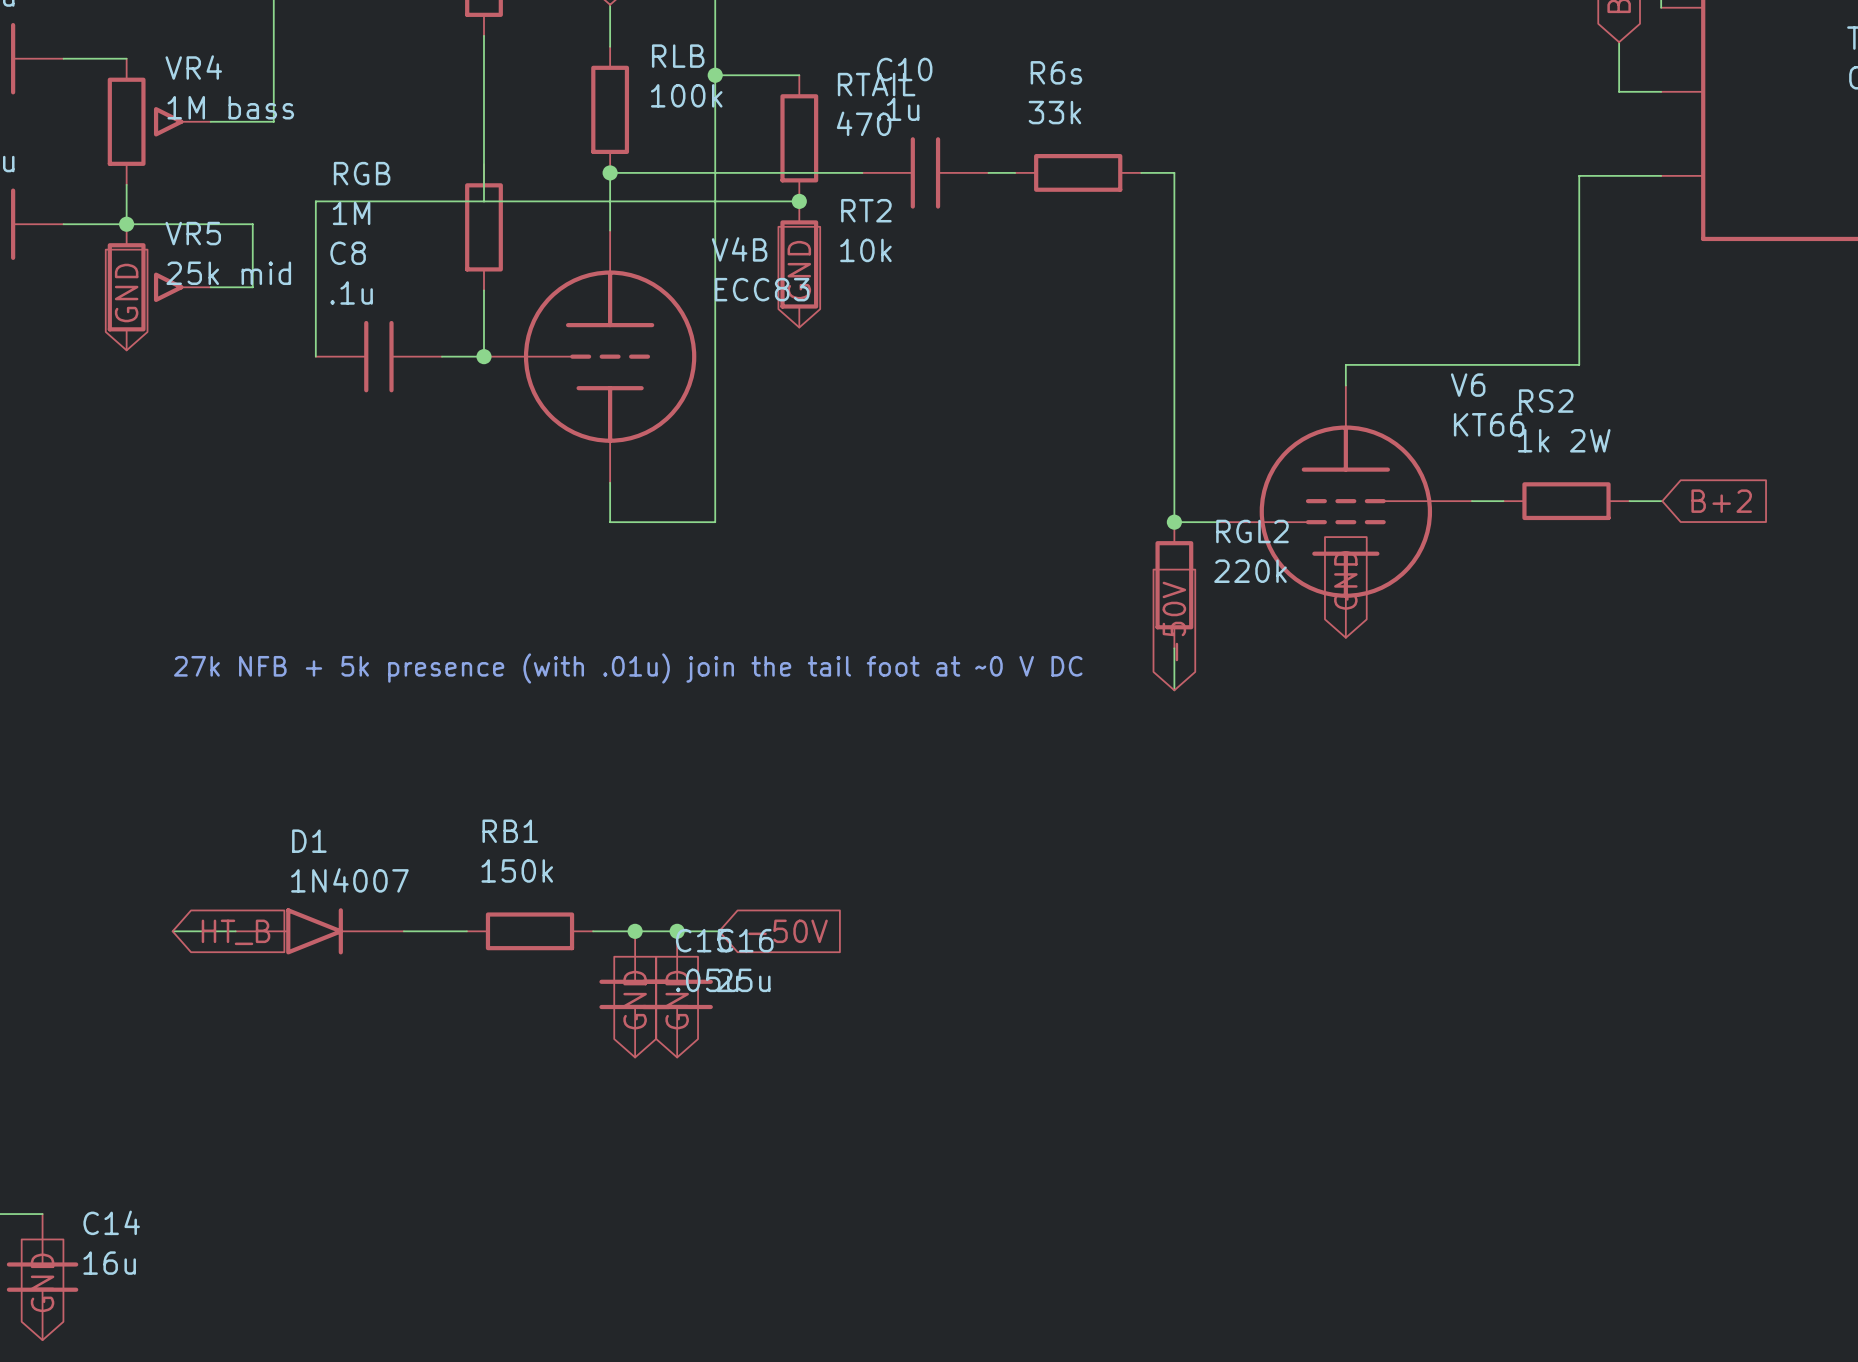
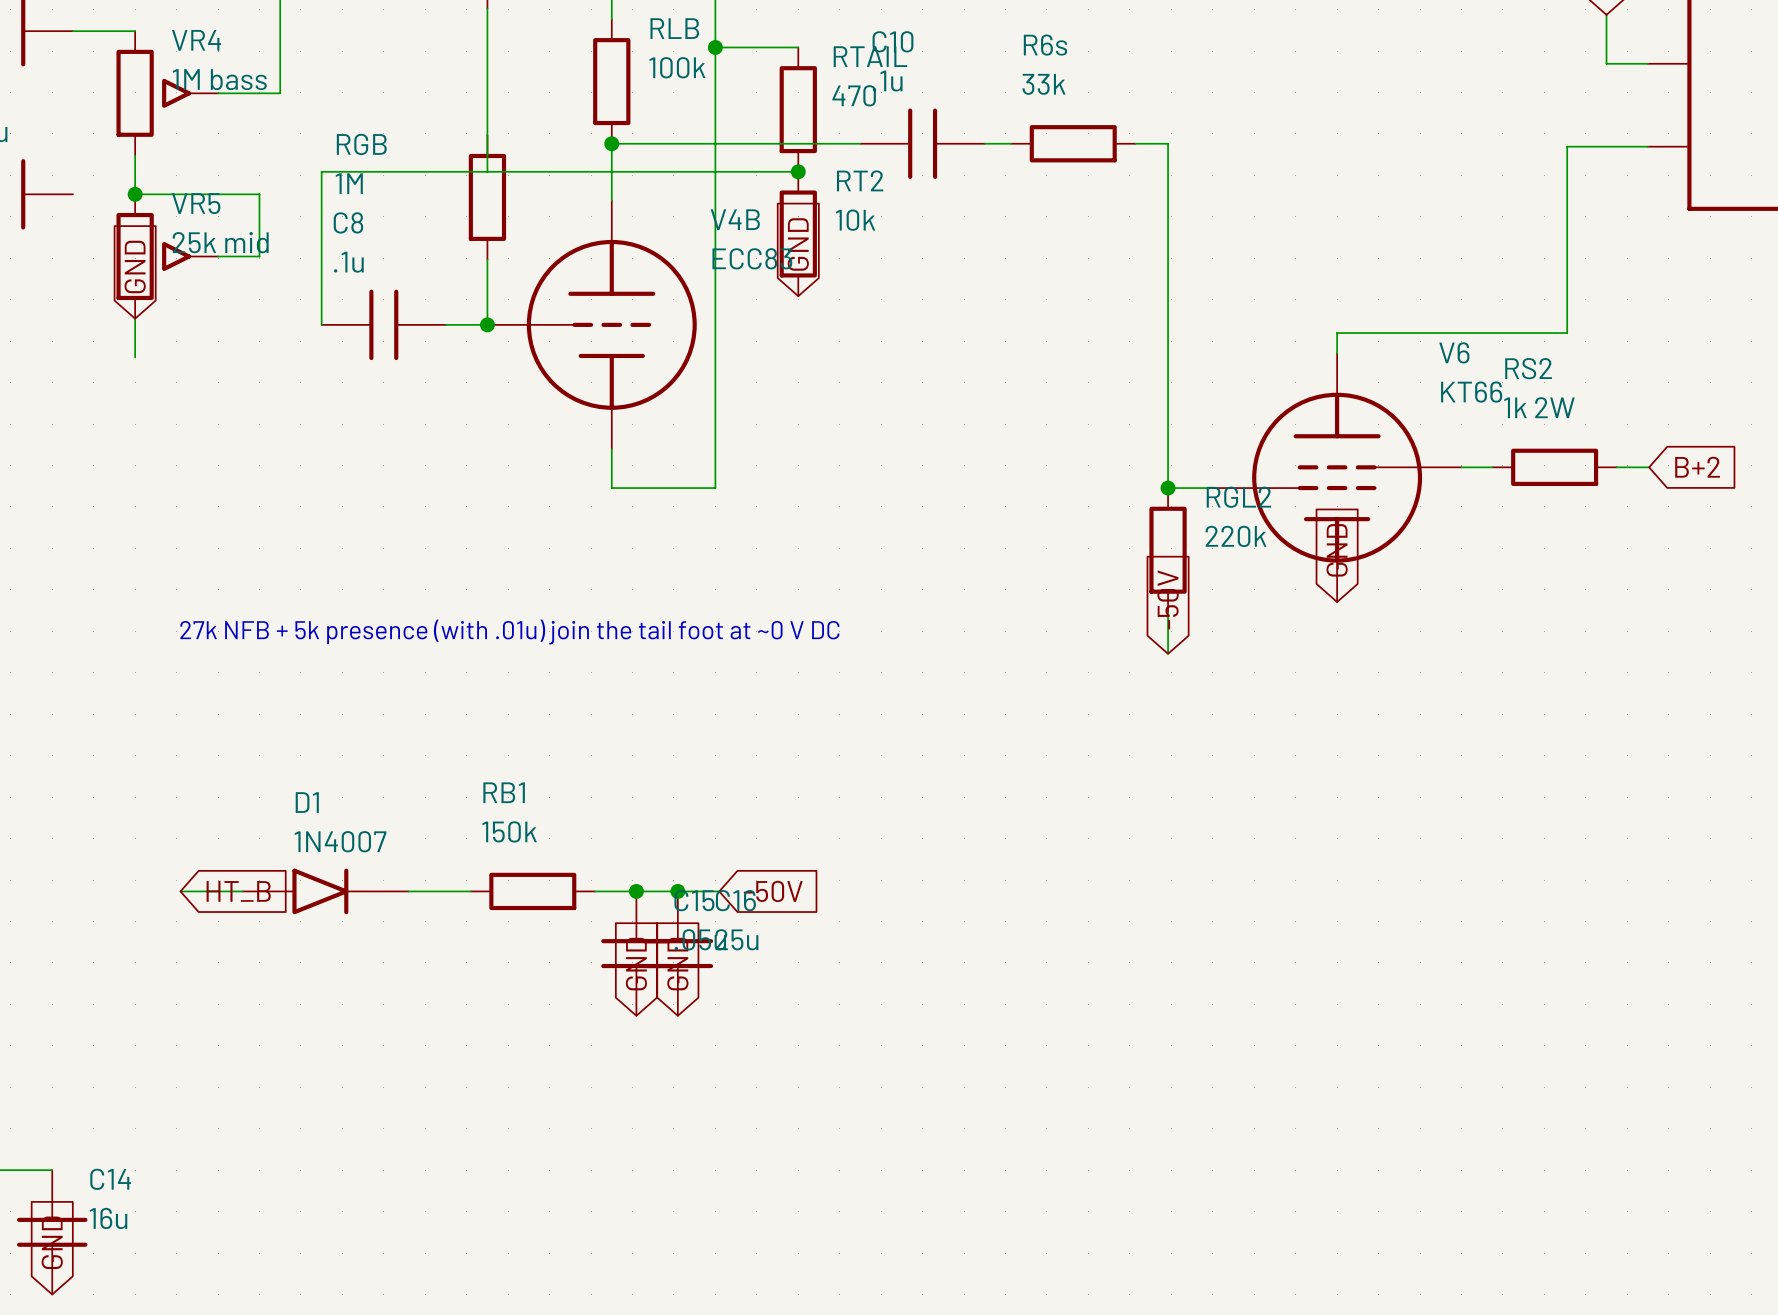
wire: (63, 224) (126, 224) -> none
wire: none -> (135, 318) (135, 357)

